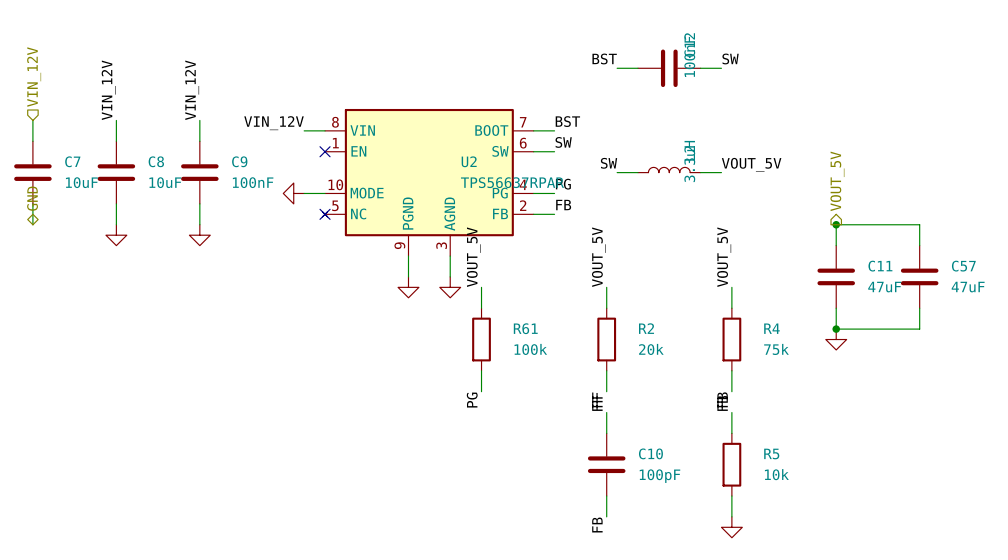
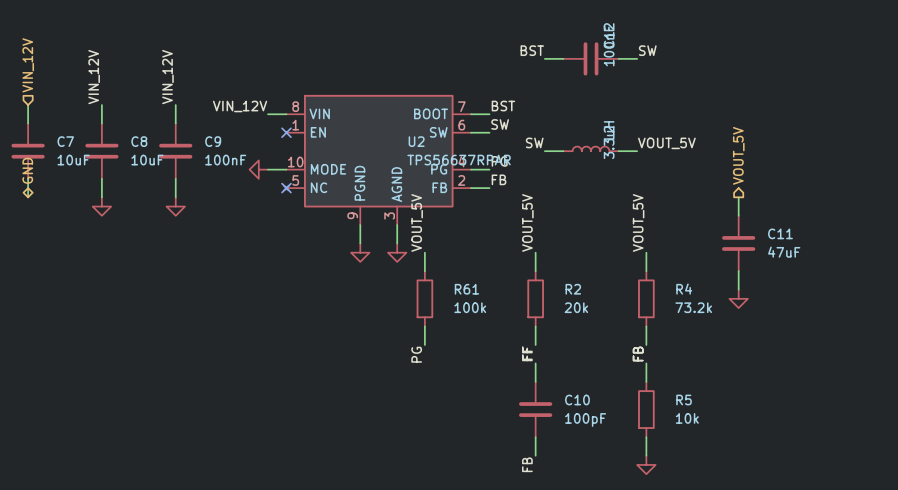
wire: (836, 224) (919, 224) (919, 245) -> none
junction: (836, 224) -> none
C57: 47uF (919, 276) -> none
wire: (919, 308) (919, 329) (836, 329) -> none
junction: (836, 329) -> none
R4 value: 75k (776, 349) -> 73.2k (693, 307)

